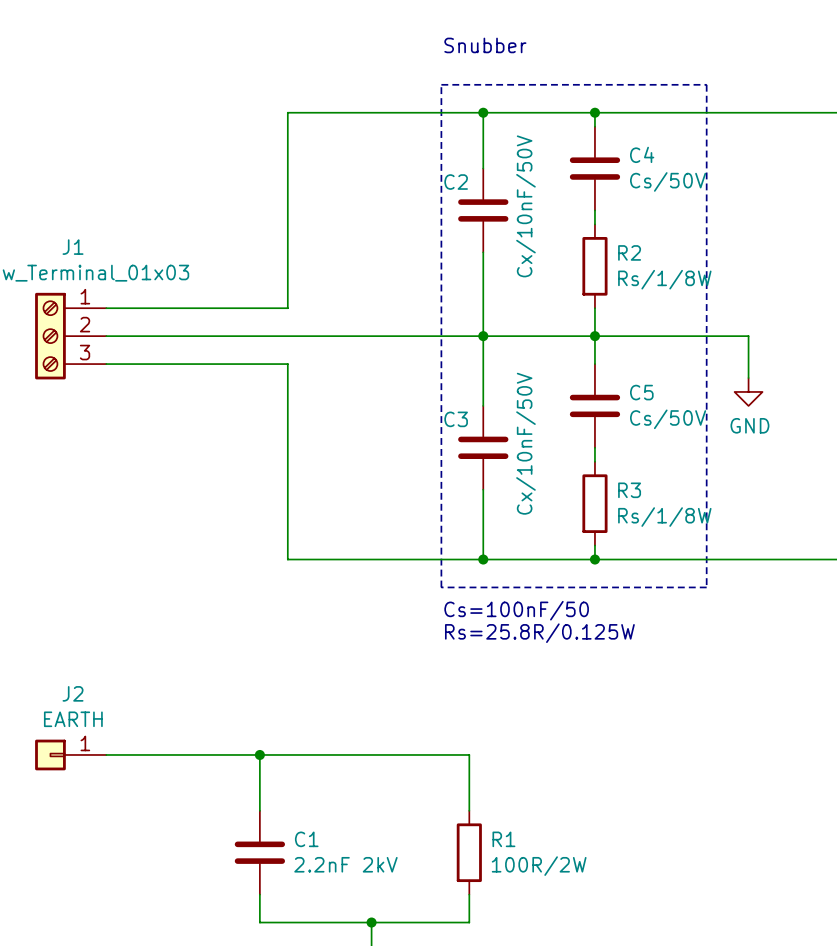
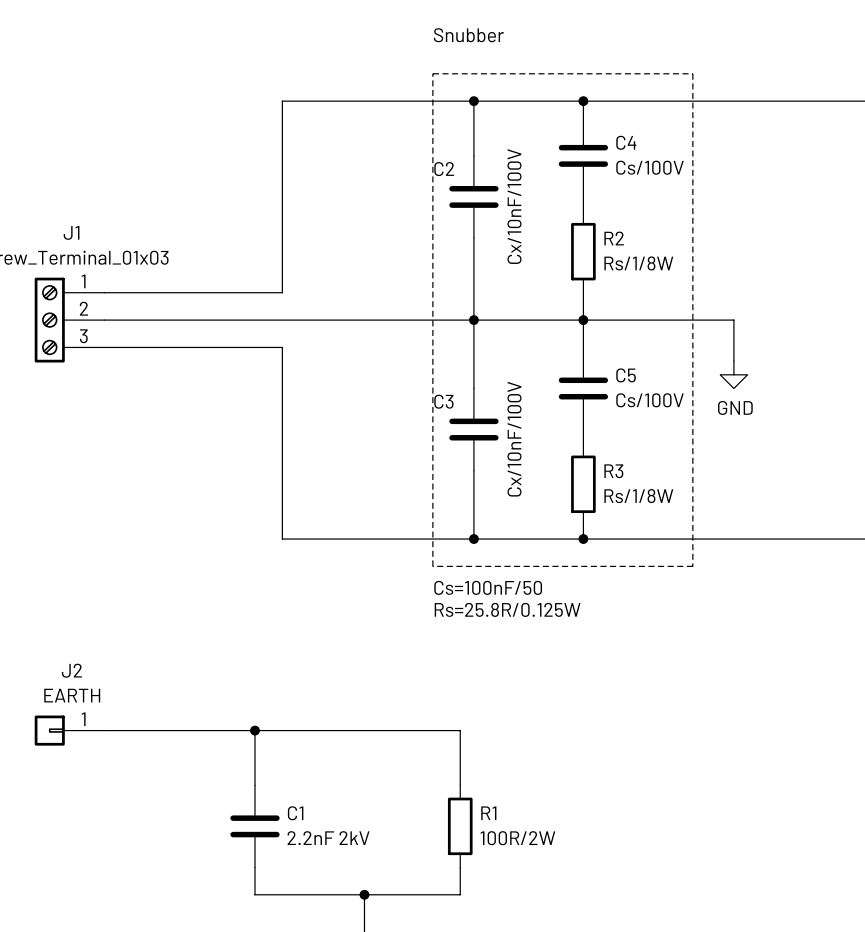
C4 value: Cs/50V (668, 181) -> Cs/100V (650, 167)
C2 value: Cx/10nF/50V (525, 206) -> Cx/10nF/100V (514, 206)
C5 value: Cs/50V (668, 419) -> Cs/100V (650, 400)
C3 value: Cx/10nF/50V (525, 443) -> Cx/10nF/100V (514, 439)

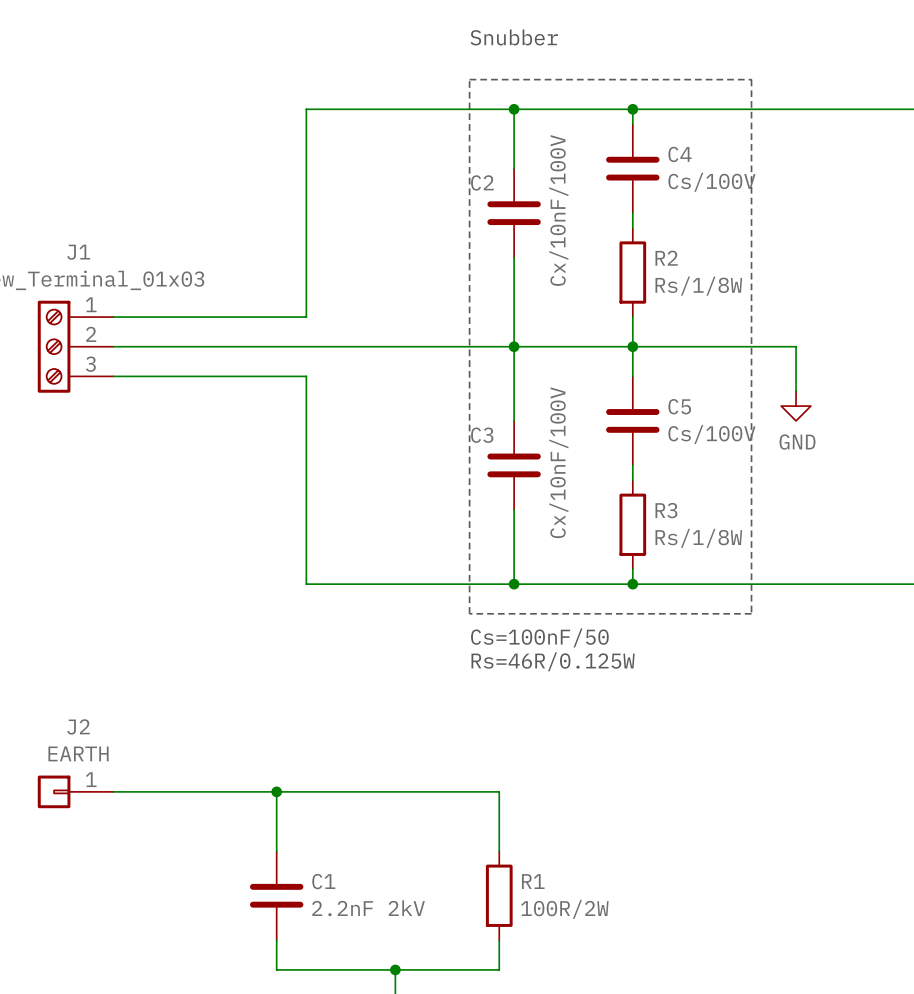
text: Rs=25.8R/0.125W (507, 609) -> Rs=46R/0.125W (553, 661)

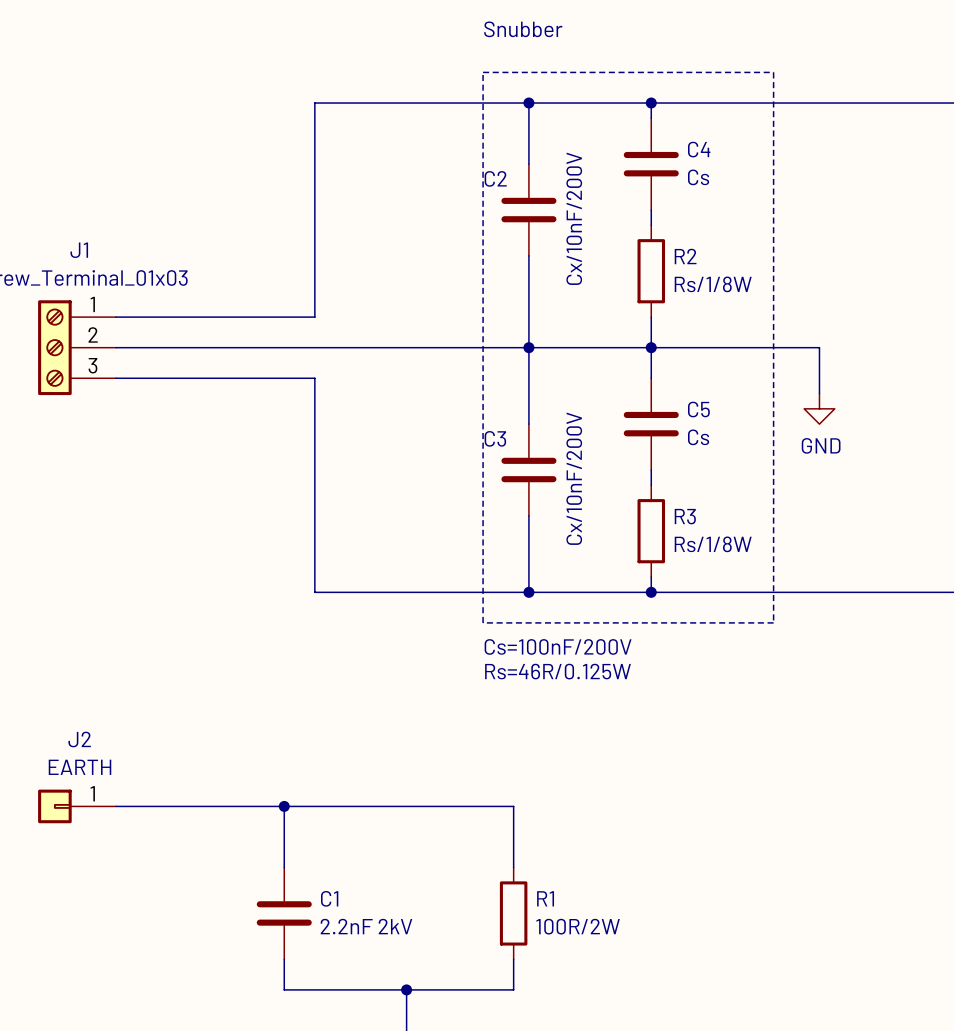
C4 value: Cs/100V (711, 182) -> Cs (698, 177)
C2 value: Cx/10nF/100V (558, 210) -> Cx/10nF/200V (574, 218)
C5 value: Cs/100V (711, 434) -> Cs (698, 437)
C3 value: Cx/10nF/100V (558, 462) -> Cx/10nF/200V (574, 478)
text: Cs=100nF/50 (539, 637) -> Cs=100nF/200V (558, 646)

